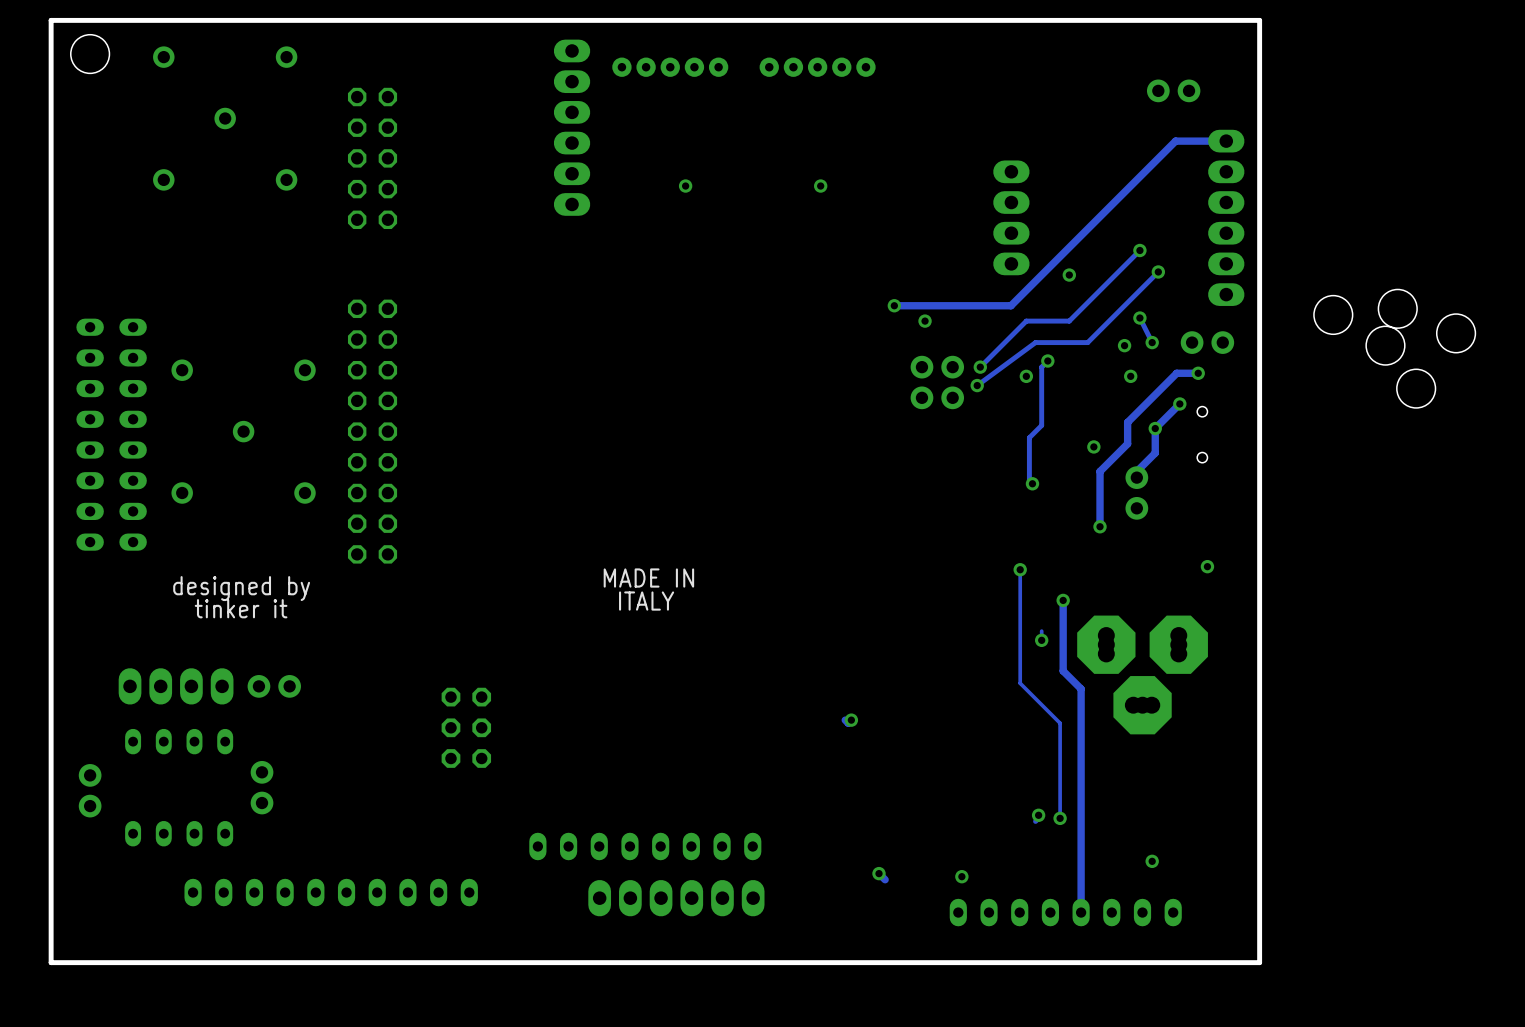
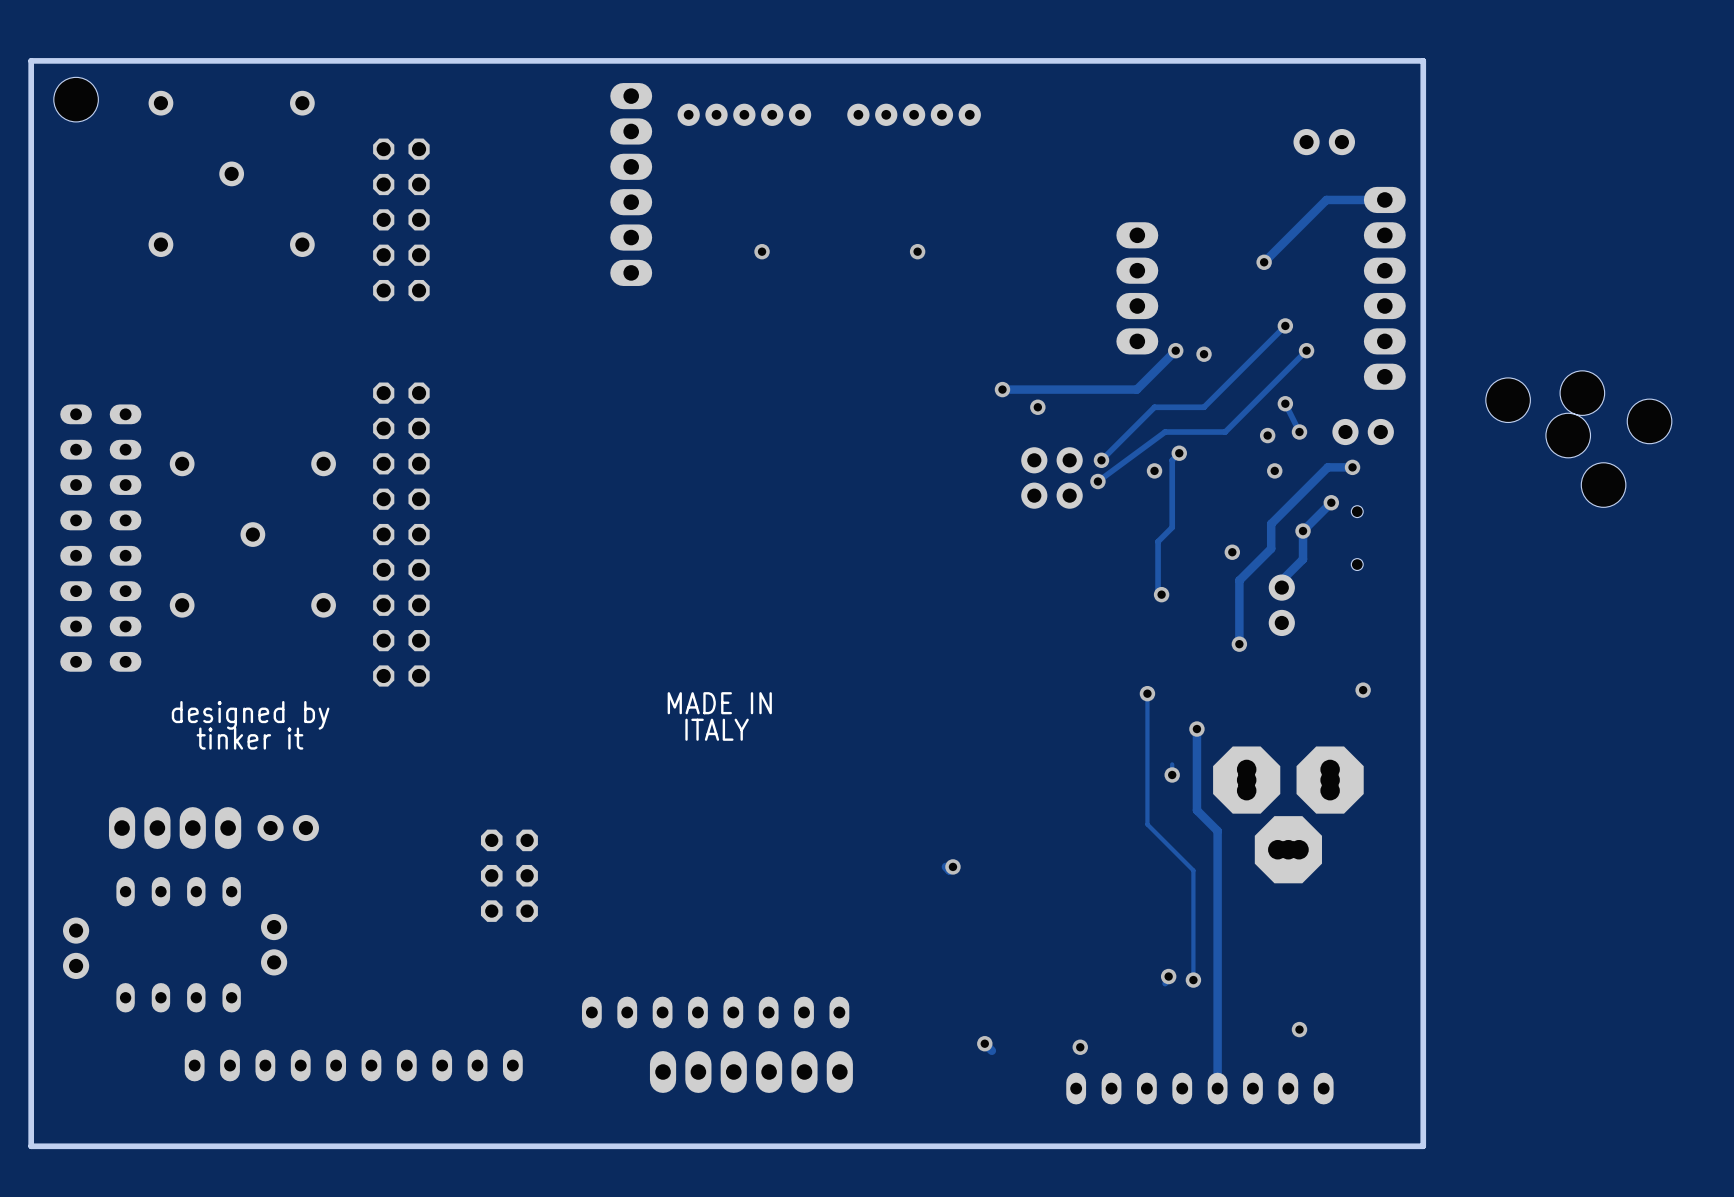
track: (1121, 195) (1044, 271) -> none
via: none -> (1264, 262)
via: none -> (1175, 350)

